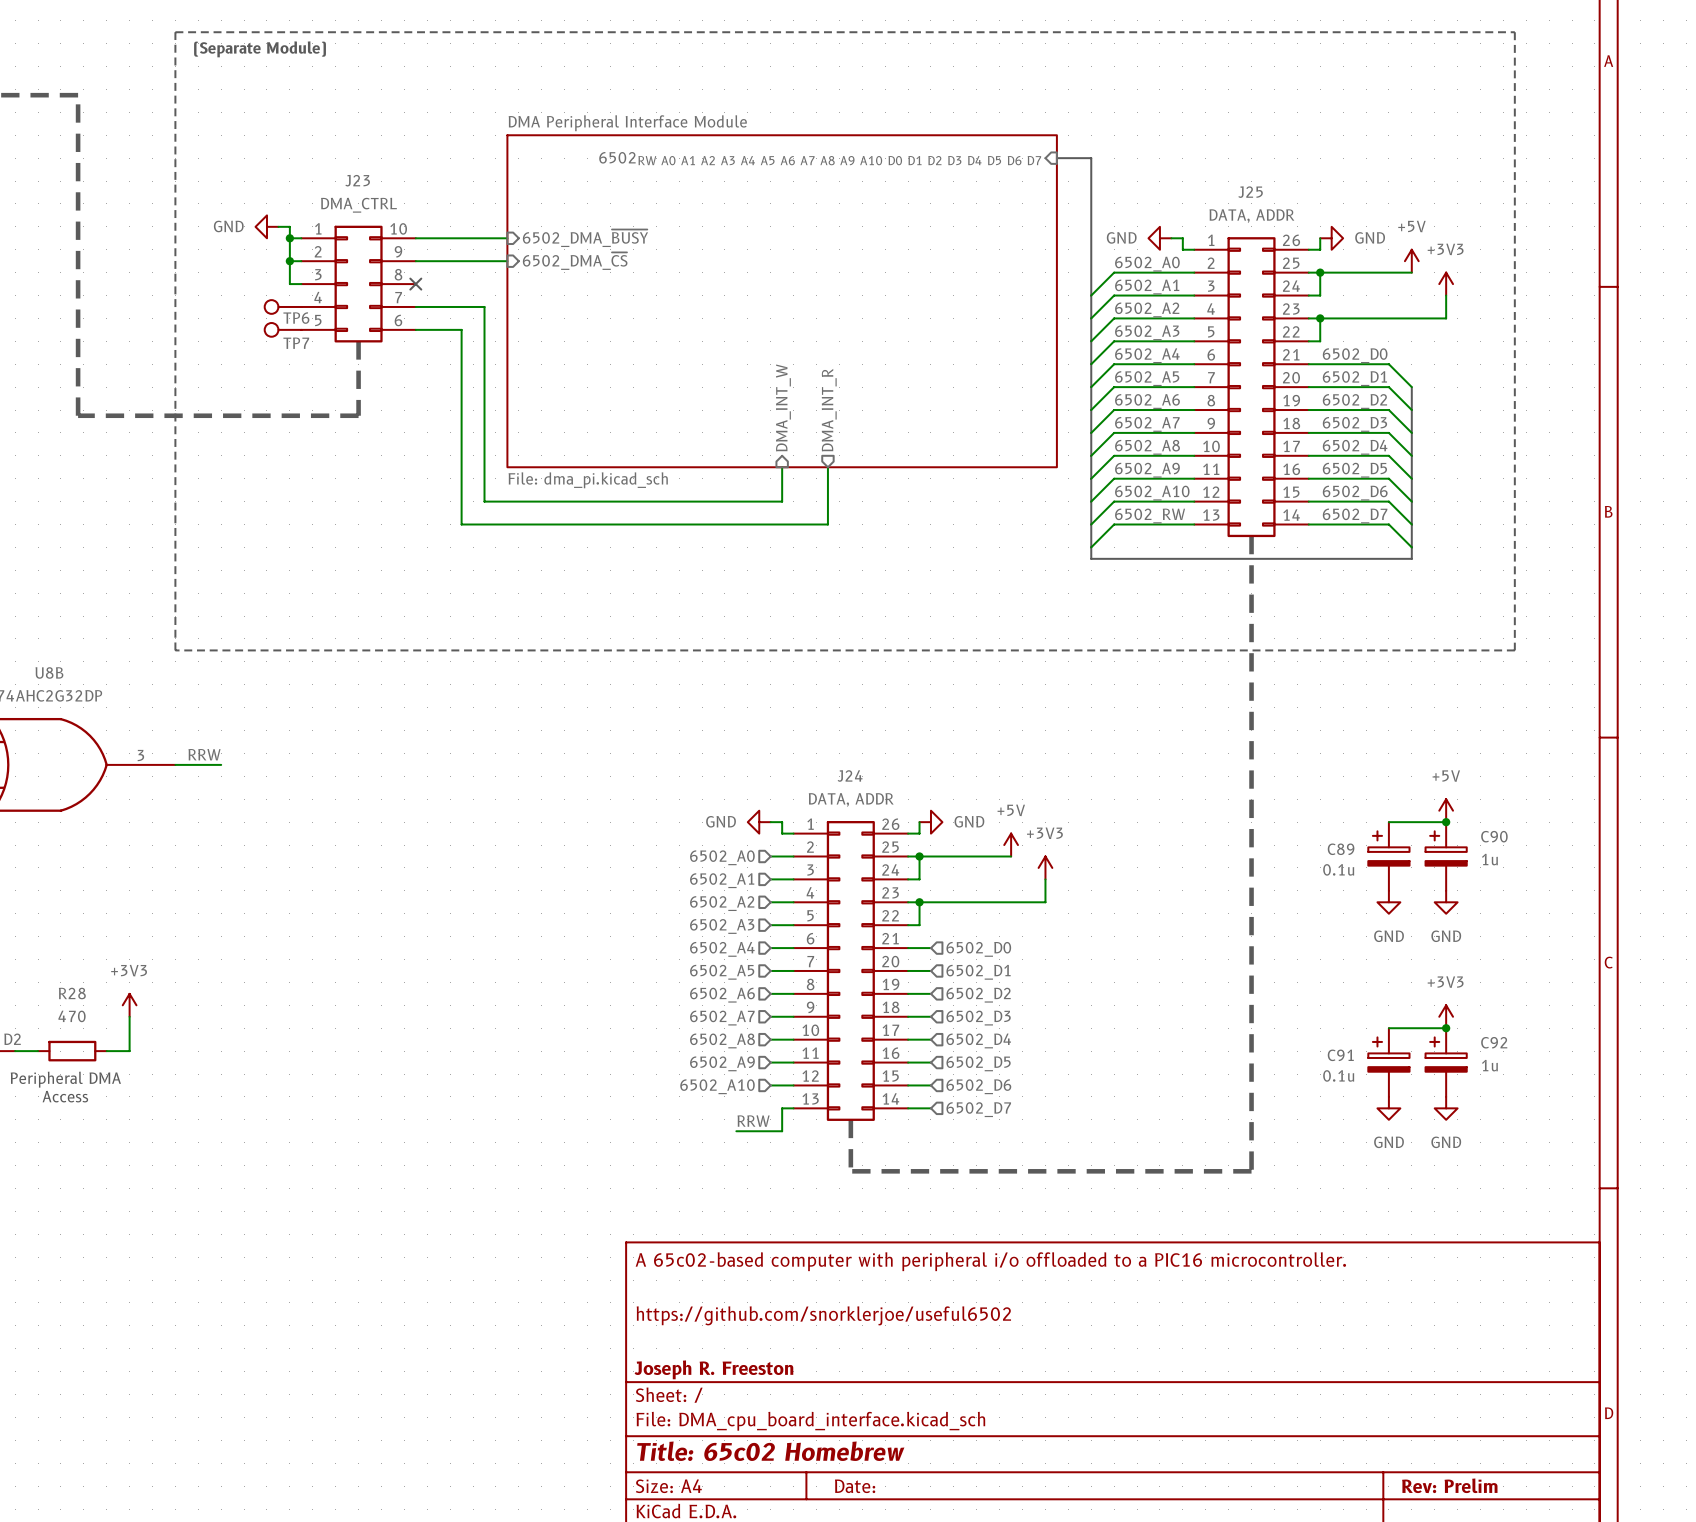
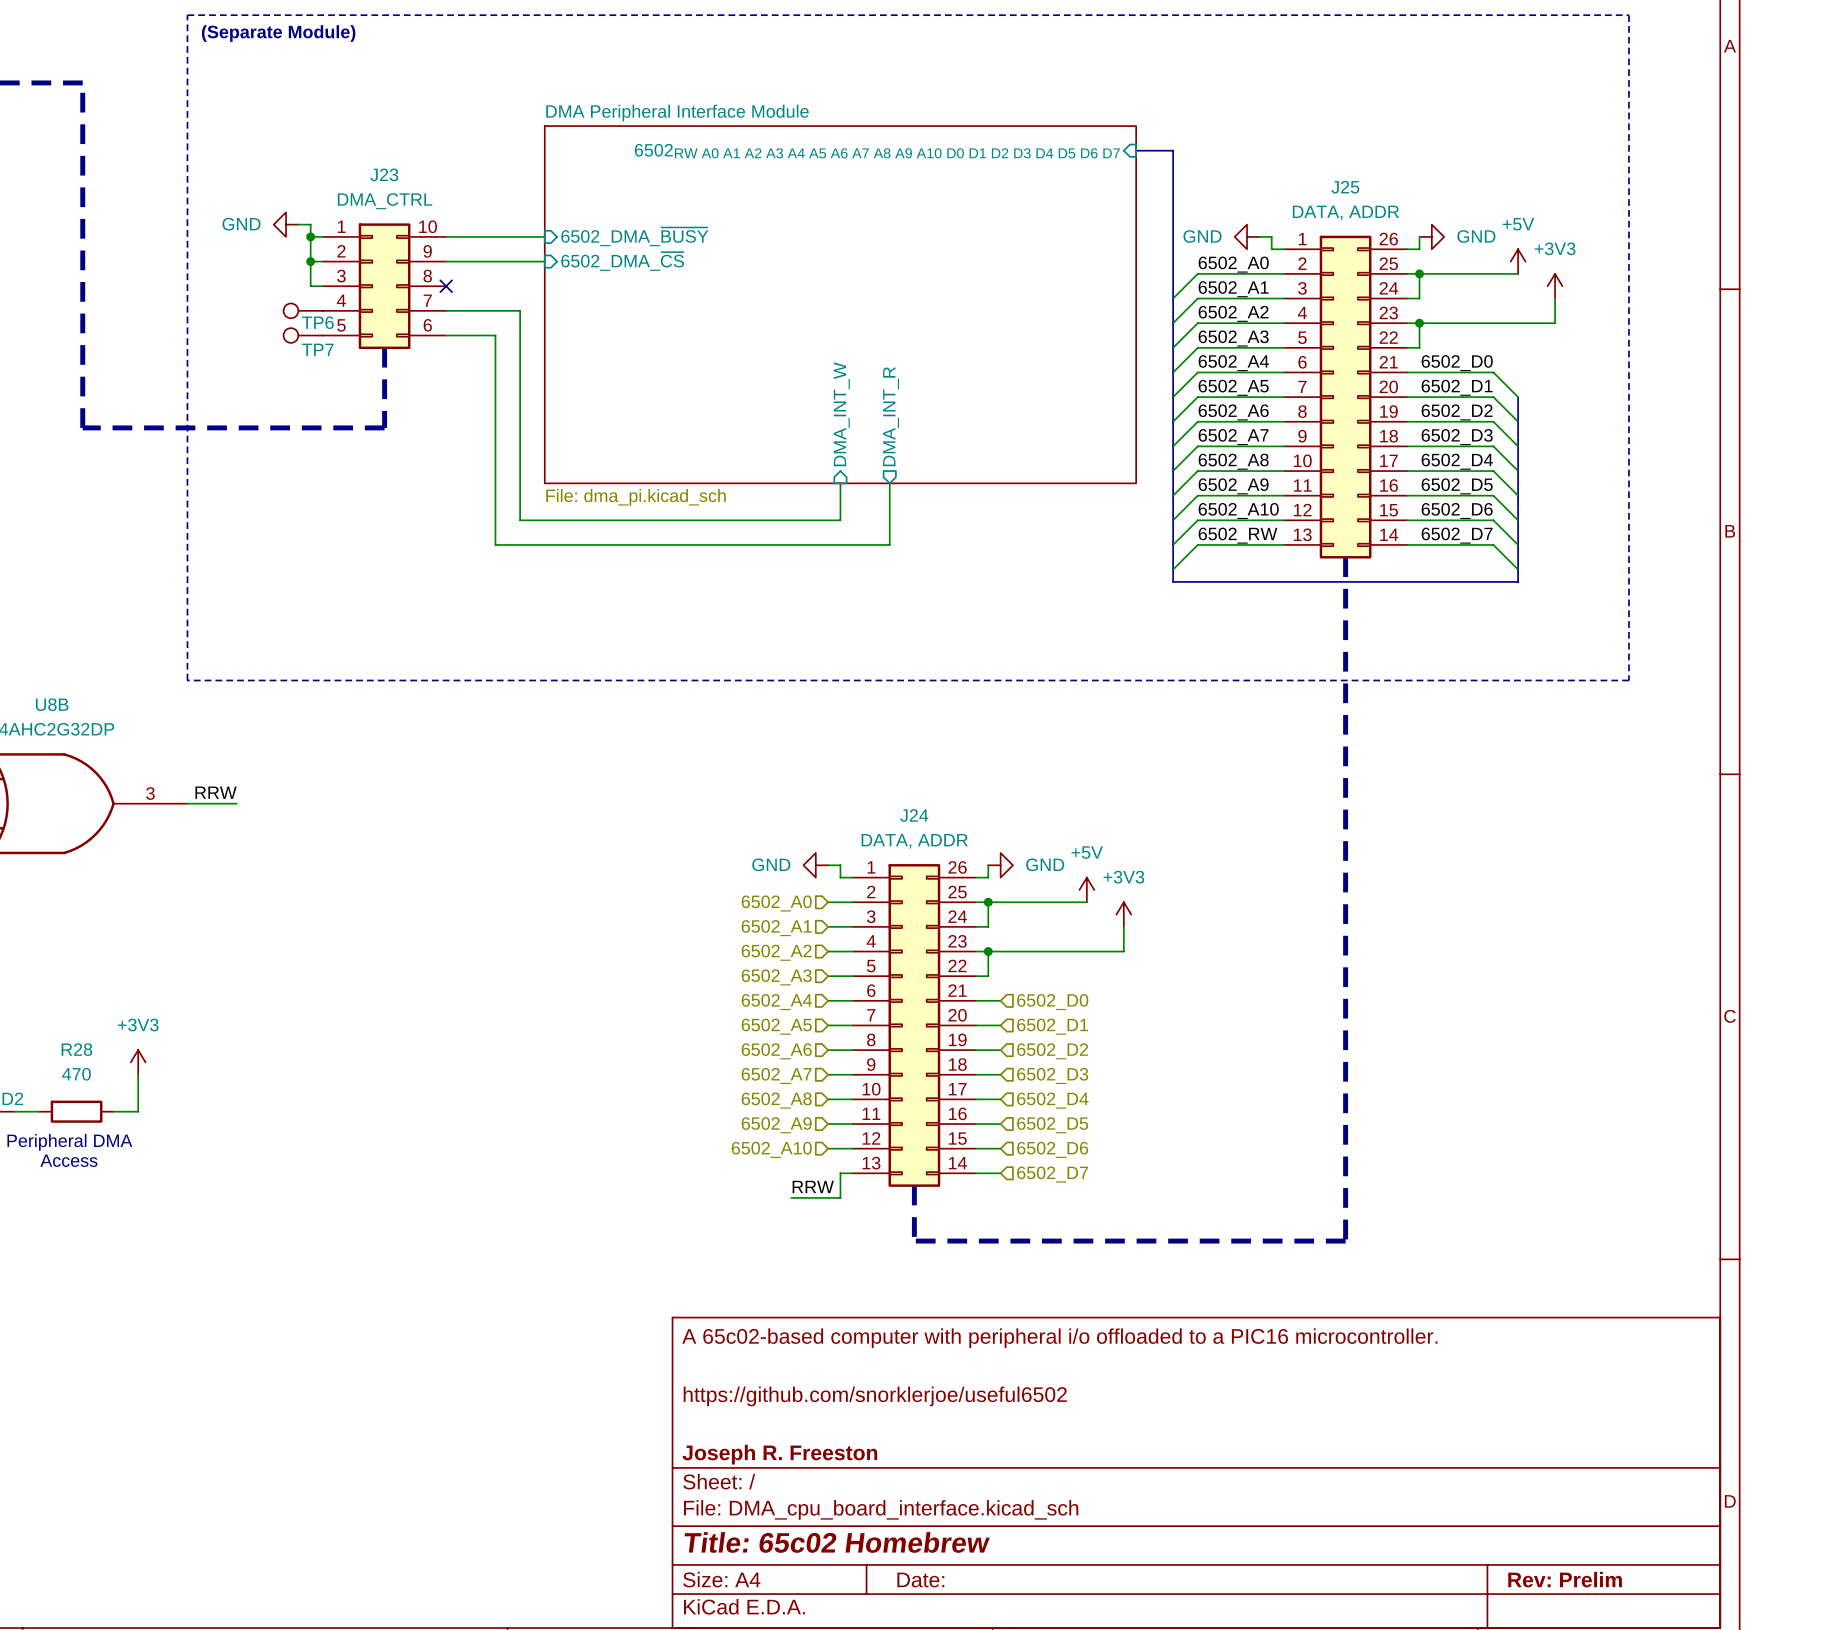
power symbol: +5V (1446, 810) -> none
wire: (1388, 822) (1446, 822) -> none
junction: (1446, 822) -> none
C89: 0.1u (1388, 856) -> none
C90: 1u (1446, 856) -> none
power symbol: GND (1388, 902) -> none
power symbol: GND (1446, 902) -> none
power symbol: +3V3 (1446, 1016) -> none
wire: (1388, 1028) (1446, 1028) -> none
junction: (1446, 1028) -> none
C91: 0.1u (1388, 1062) -> none
C92: 1u (1446, 1062) -> none
power symbol: GND (1388, 1108) -> none
power symbol: GND (1446, 1108) -> none

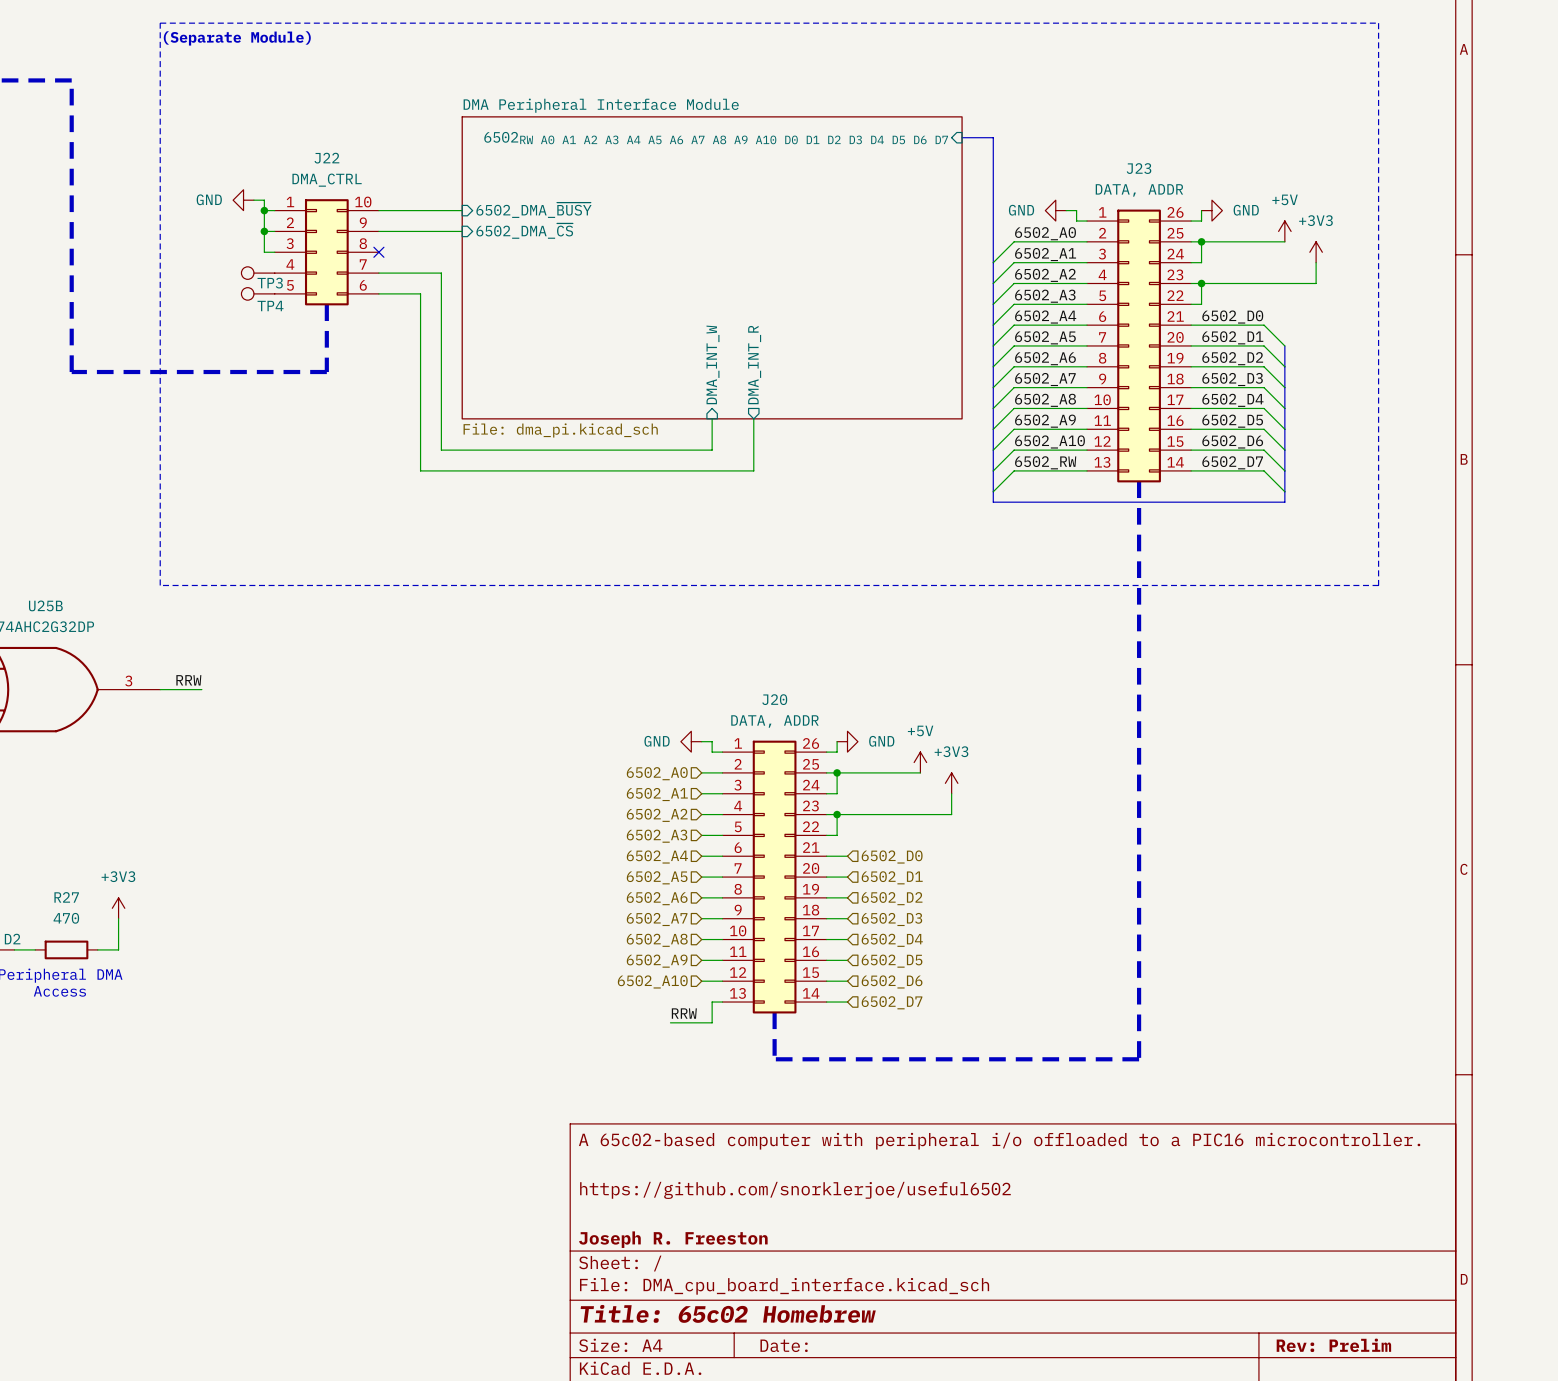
J23 name: J23 (384, 174) -> J22 (326, 158)
J25 name: J25 (1345, 187) -> J23 (1139, 168)
TP6 name: TP6 (317, 322) -> TP3 (270, 283)
TP7 name: TP7 (317, 349) -> TP4 (270, 306)
U8B name: U8B (52, 704) -> U25B (45, 605)
J24 name: J24 (914, 815) -> J20 (774, 699)
R28 name: R28 (76, 1049) -> R27 (66, 897)

